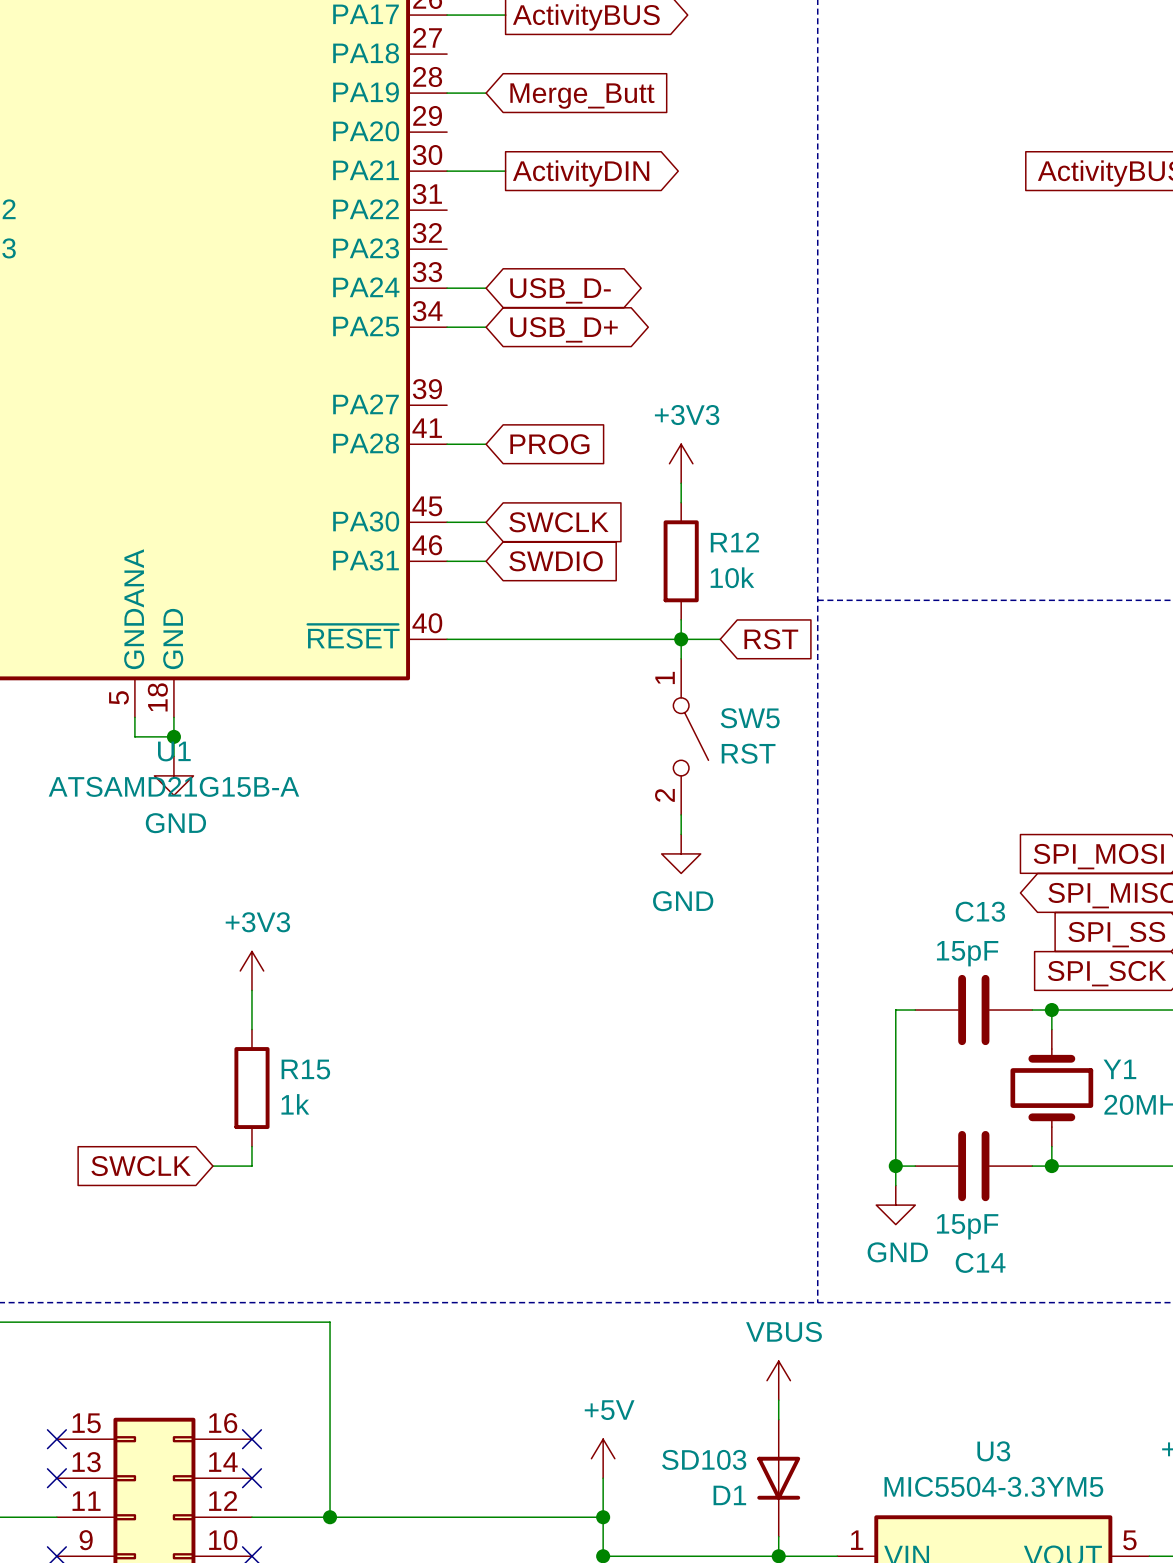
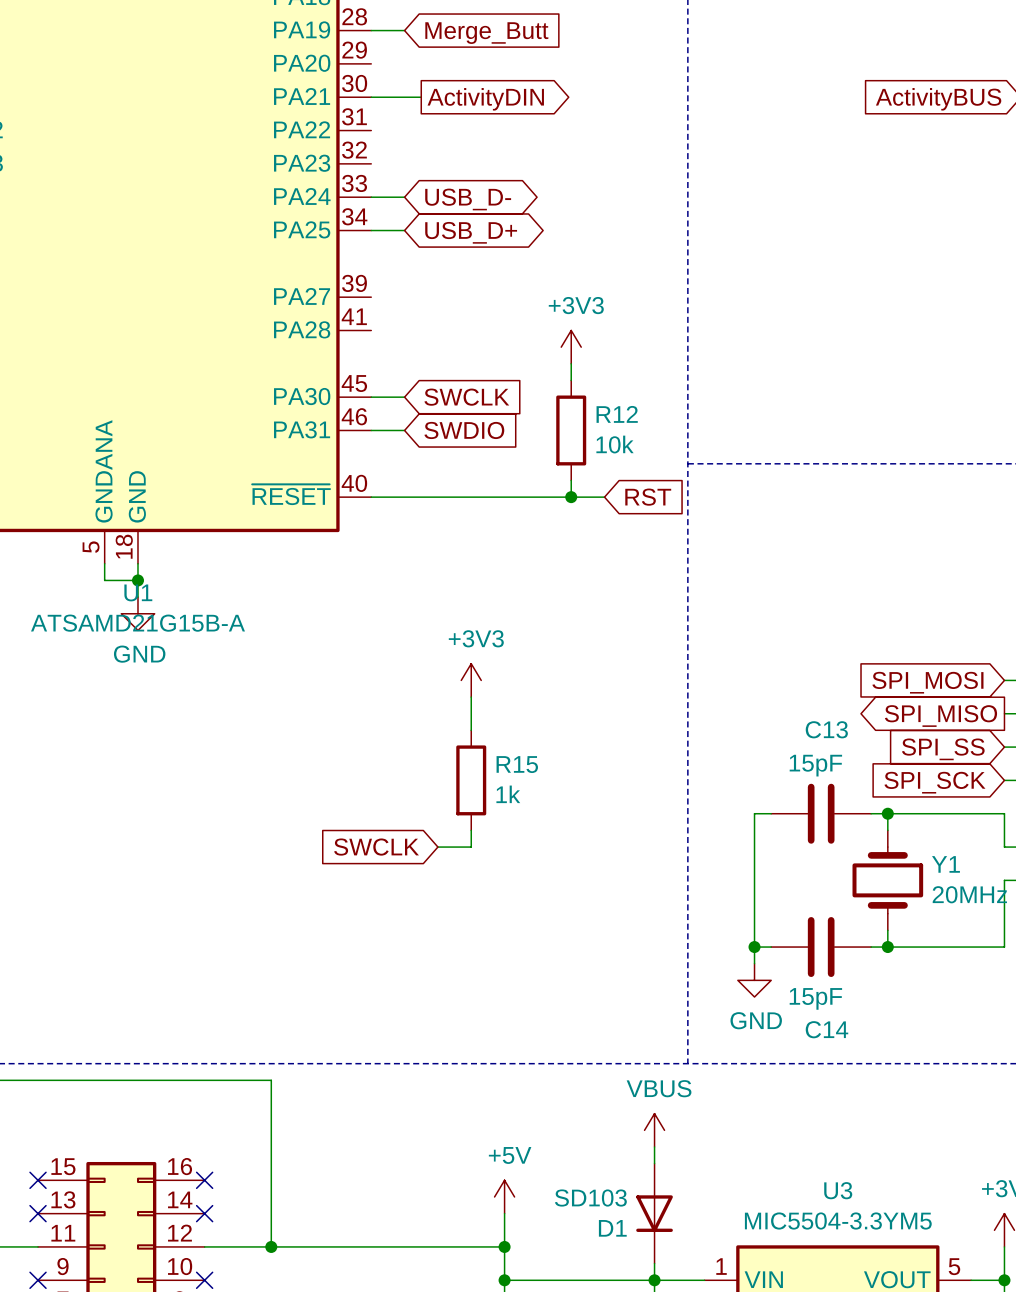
wire: (447, 444) (486, 444) -> none
global label: PROG (549, 444) -> none
wire: (681, 639) (681, 658) -> none
SW5: RST (690, 736) -> none
wire: (681, 814) (681, 834) -> none
power symbol: GND (681, 853) -> none
power symbol position: +3V3 (251, 970) -> +3V3 (471, 680)
wire: (251, 990) (251, 1029) -> (471, 697) (471, 730)
R15 position: (251, 1088) -> (471, 780)
wire: (251, 1146) (251, 1166) (212, 1166) -> (471, 830) (471, 847) (437, 847)
global label position: SWCLK (141, 1166) -> SWCLK (376, 847)

